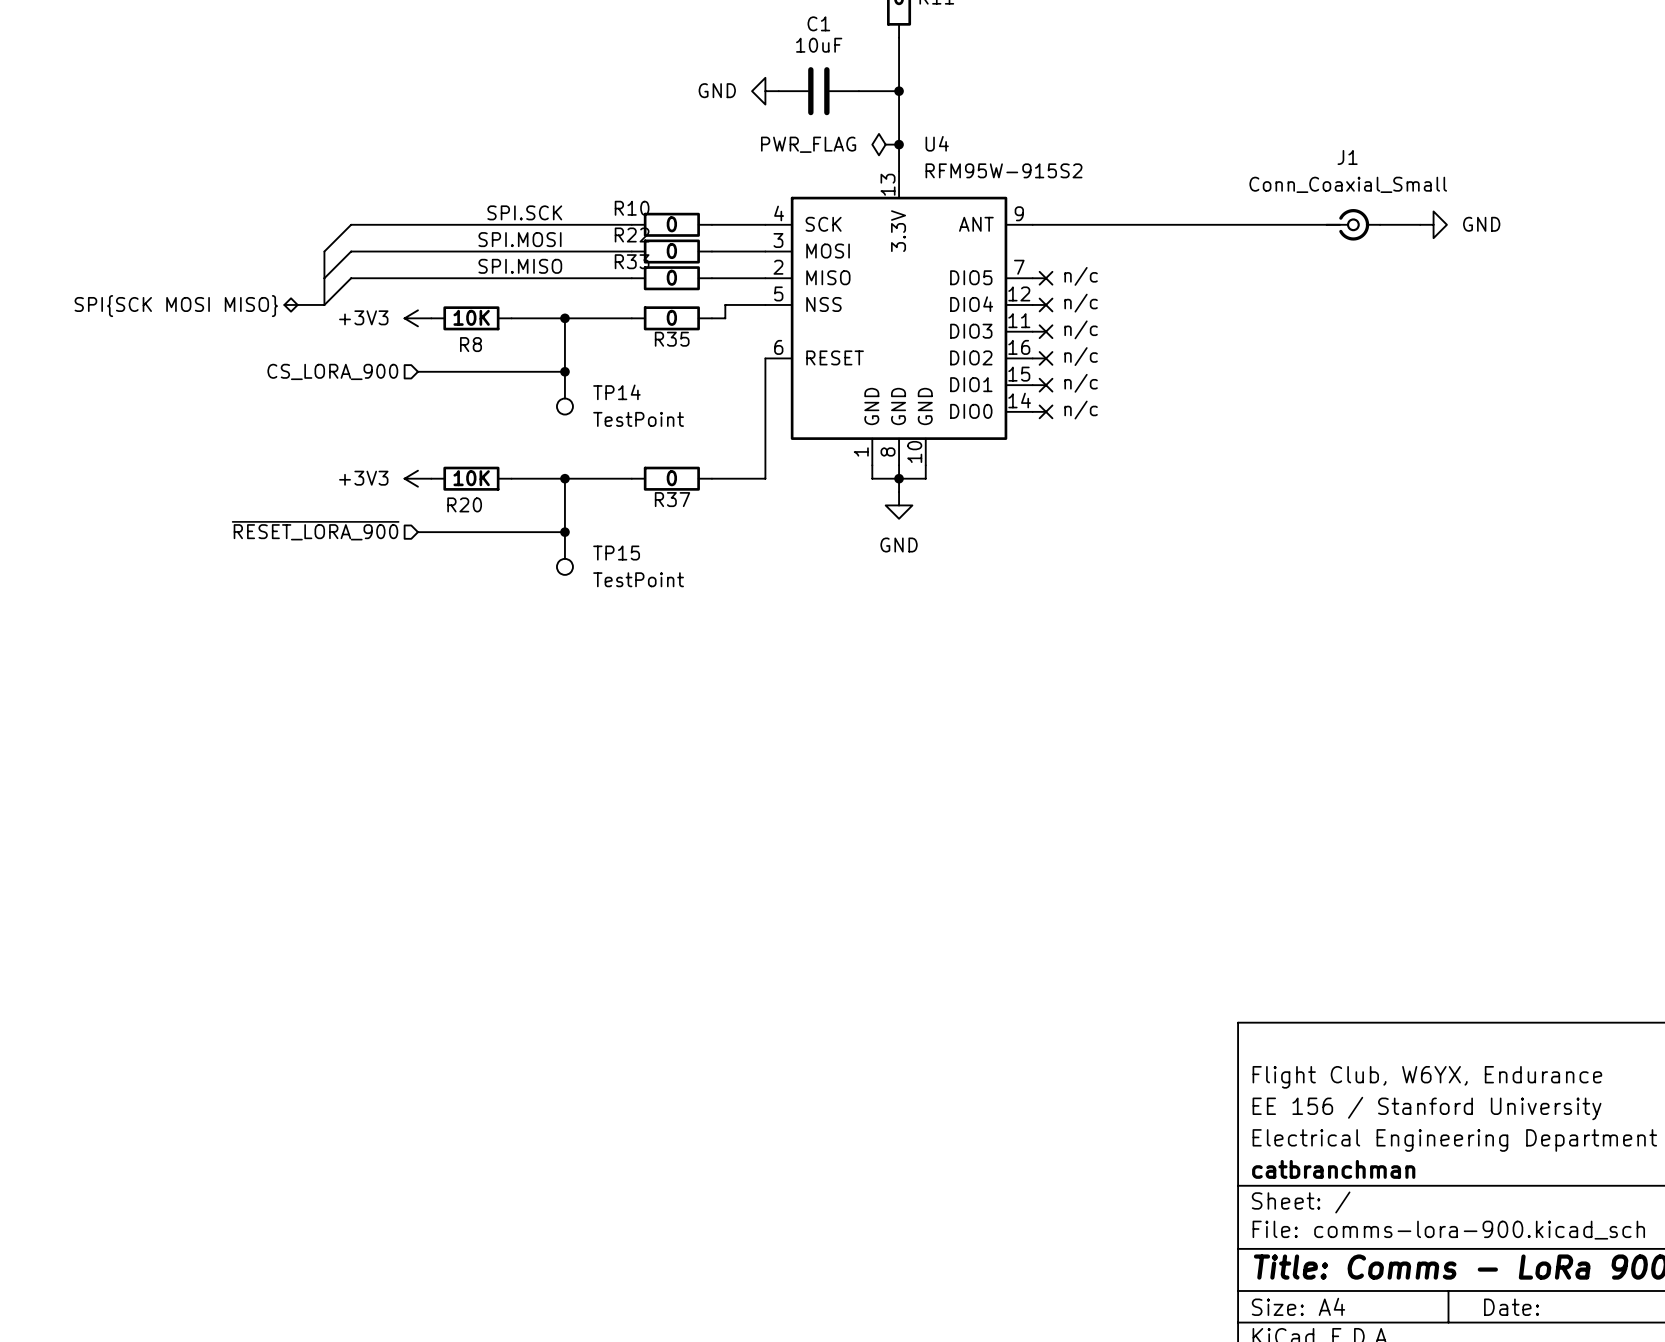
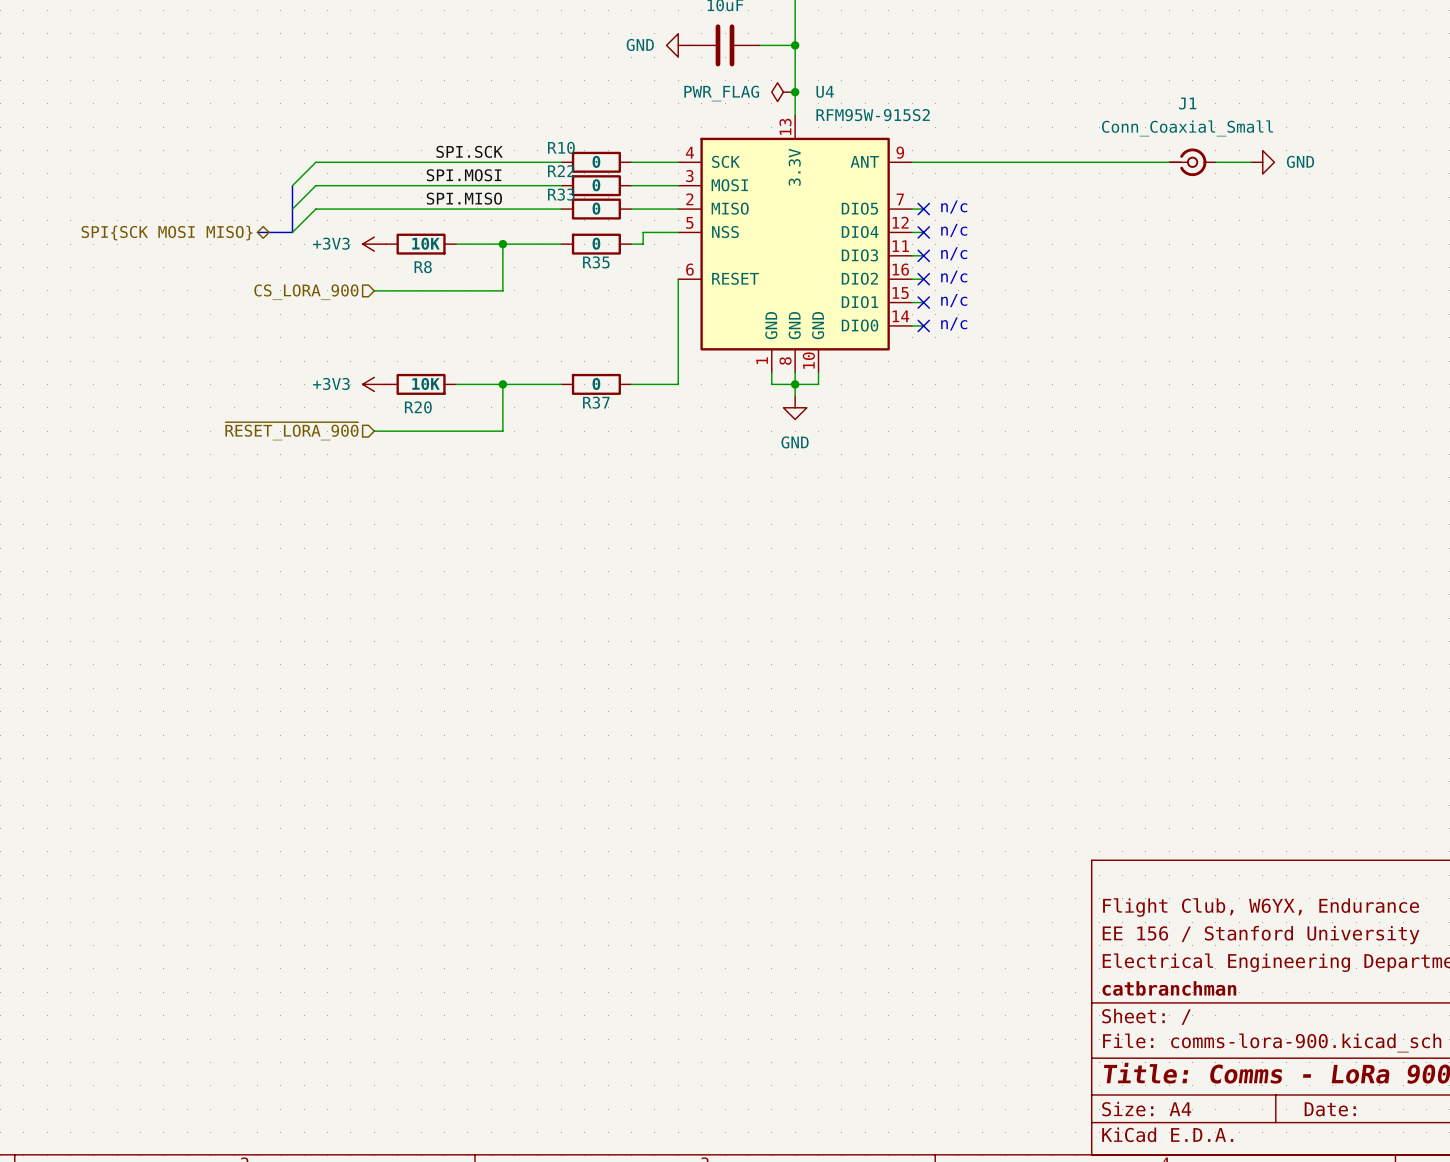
junction: (564, 371) -> none
TP14: TestPoint (564, 393) -> none
junction: (564, 532) -> none
TP15: TestPoint (564, 553) -> none

